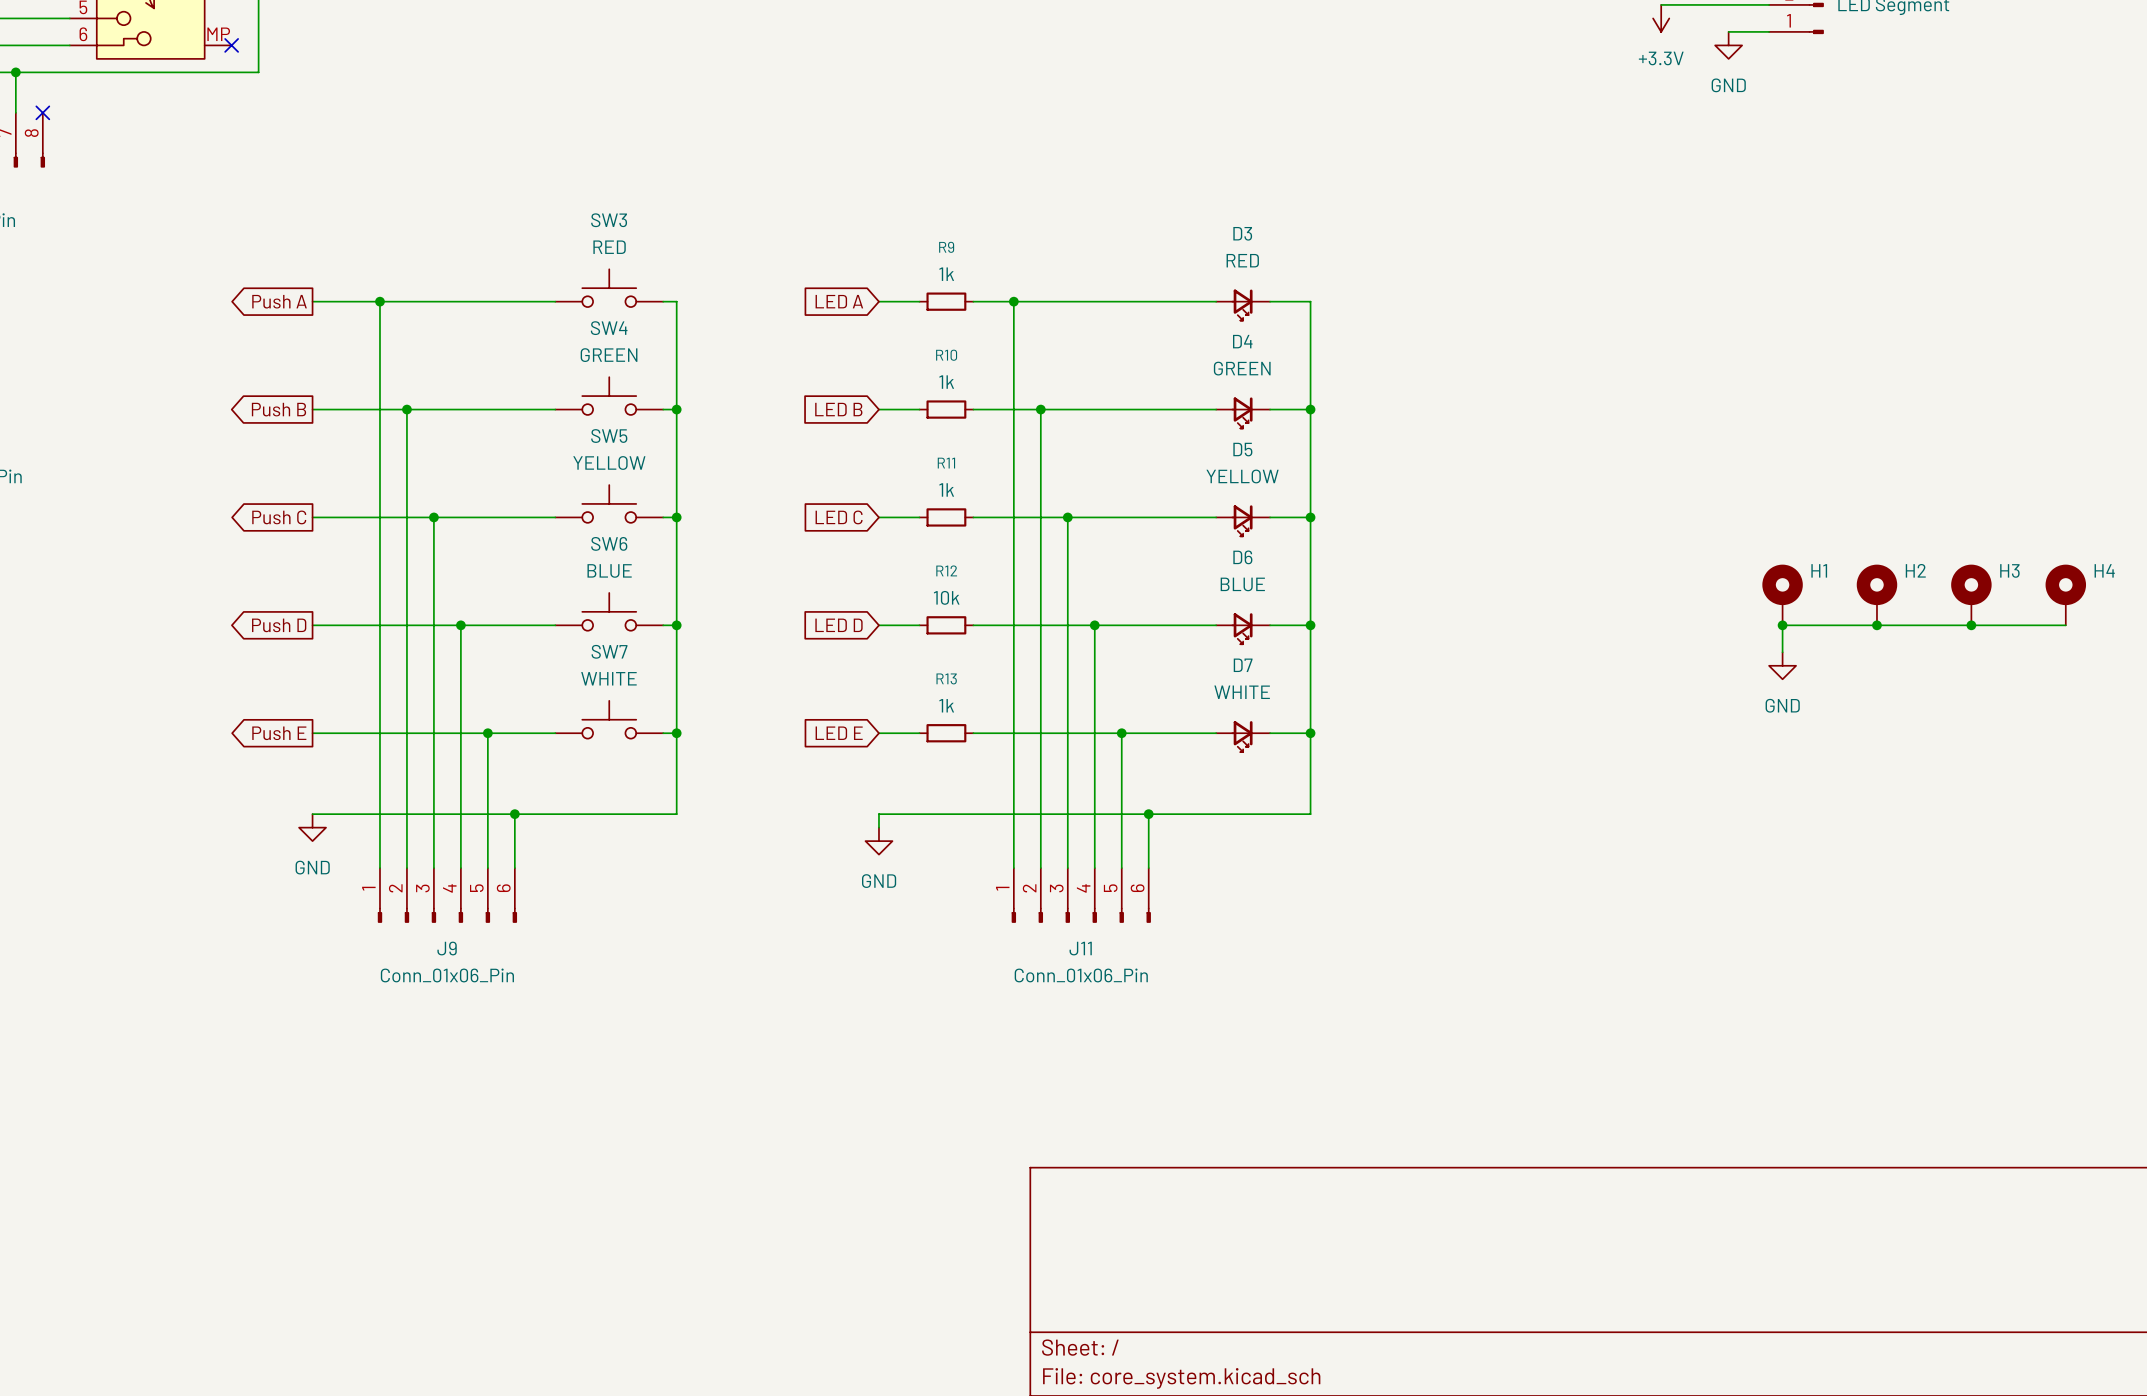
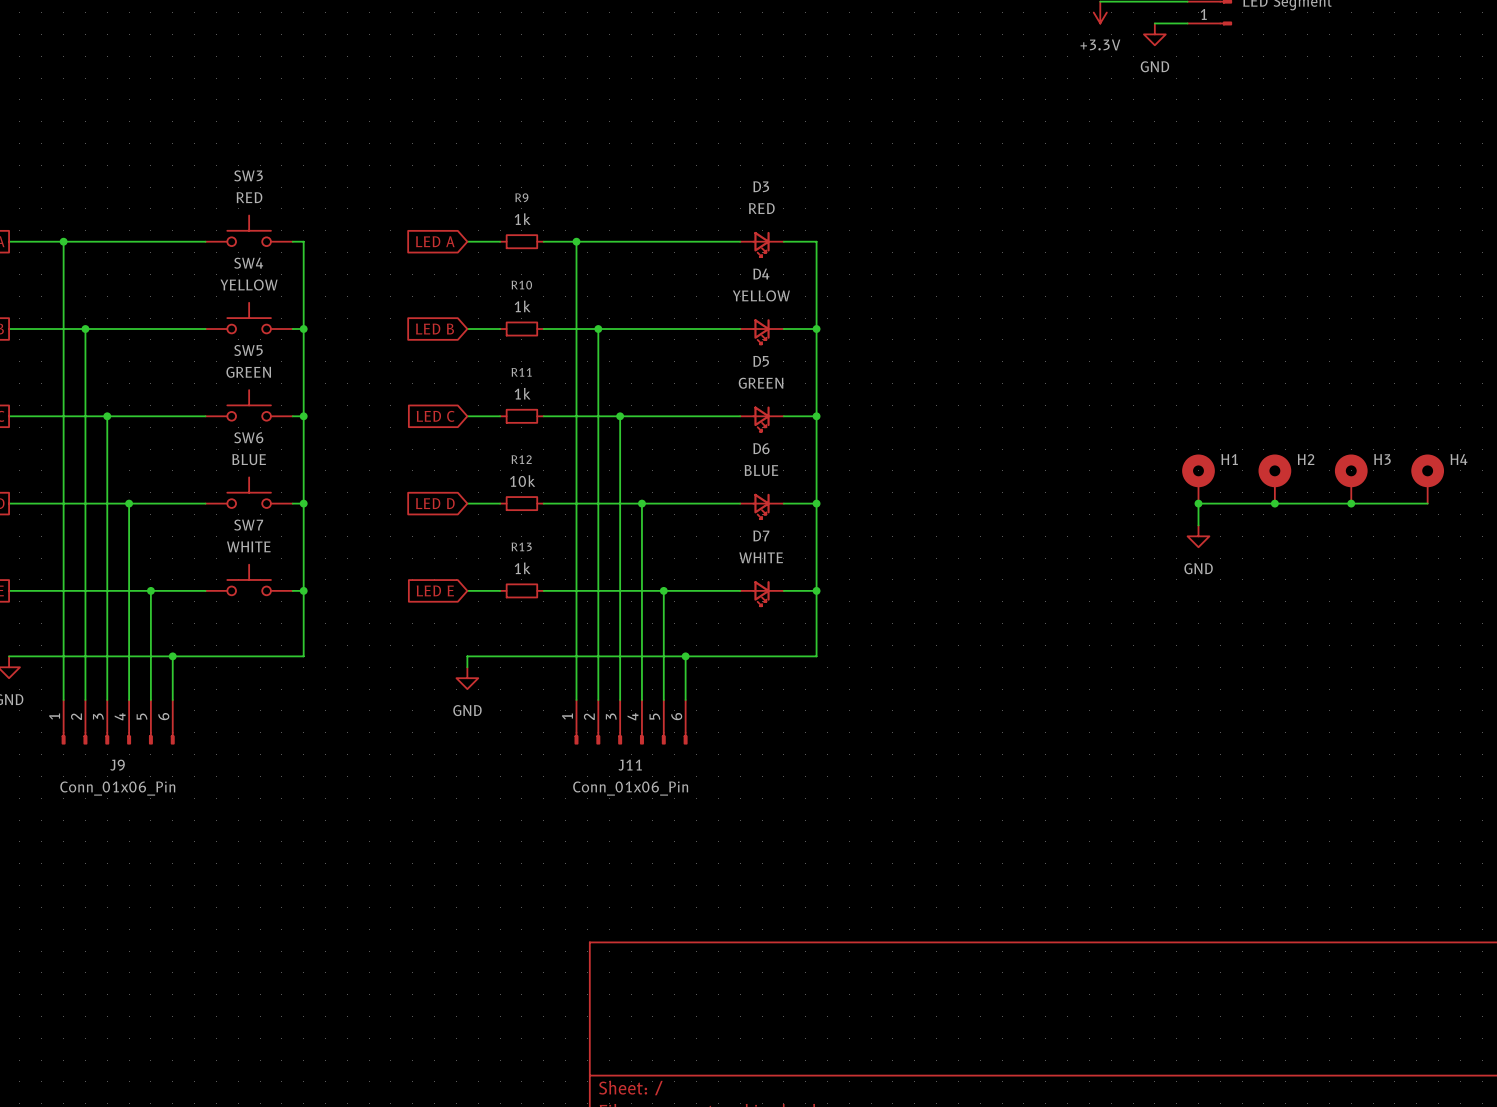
SW4 value: GREEN (609, 355) -> YELLOW (249, 285)
D4 value: GREEN (1242, 368) -> YELLOW (761, 295)
SW5 value: YELLOW (609, 462) -> GREEN (248, 372)
D5 value: YELLOW (1242, 476) -> GREEN (761, 383)

